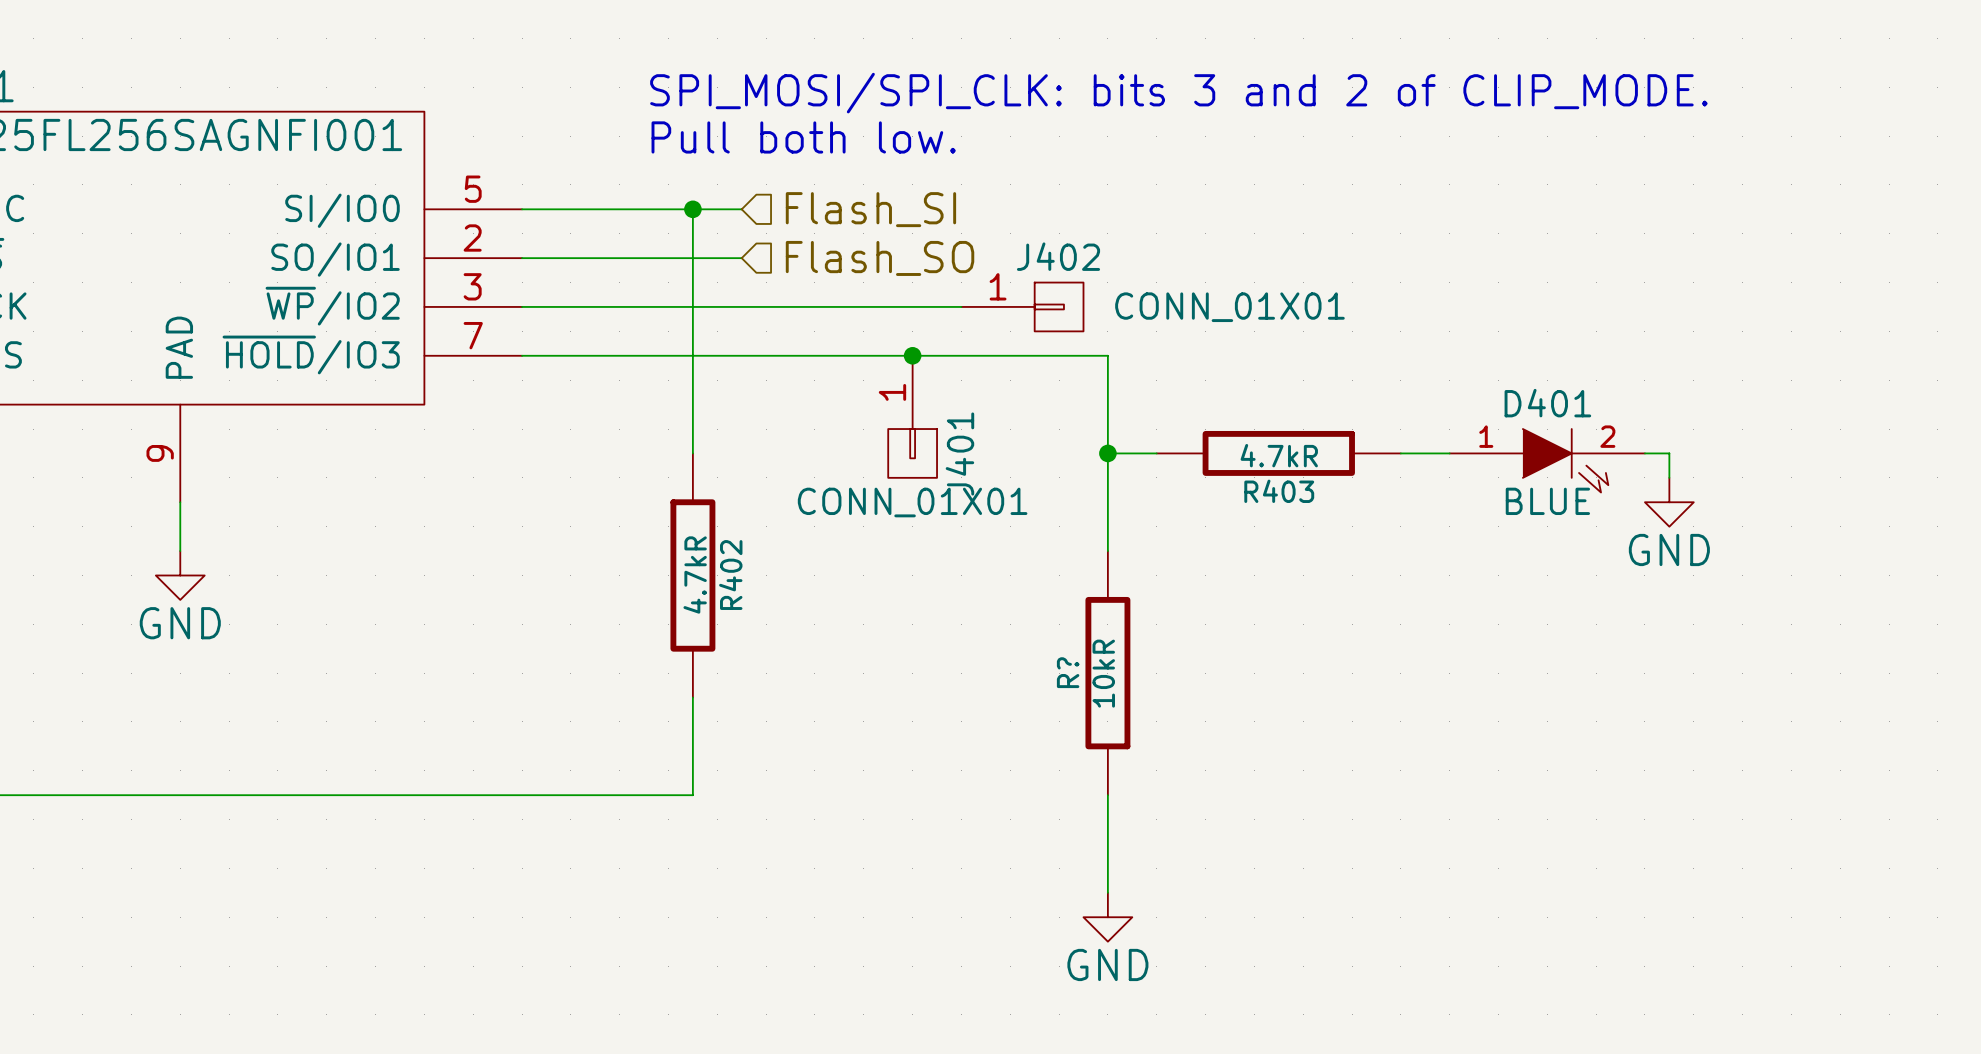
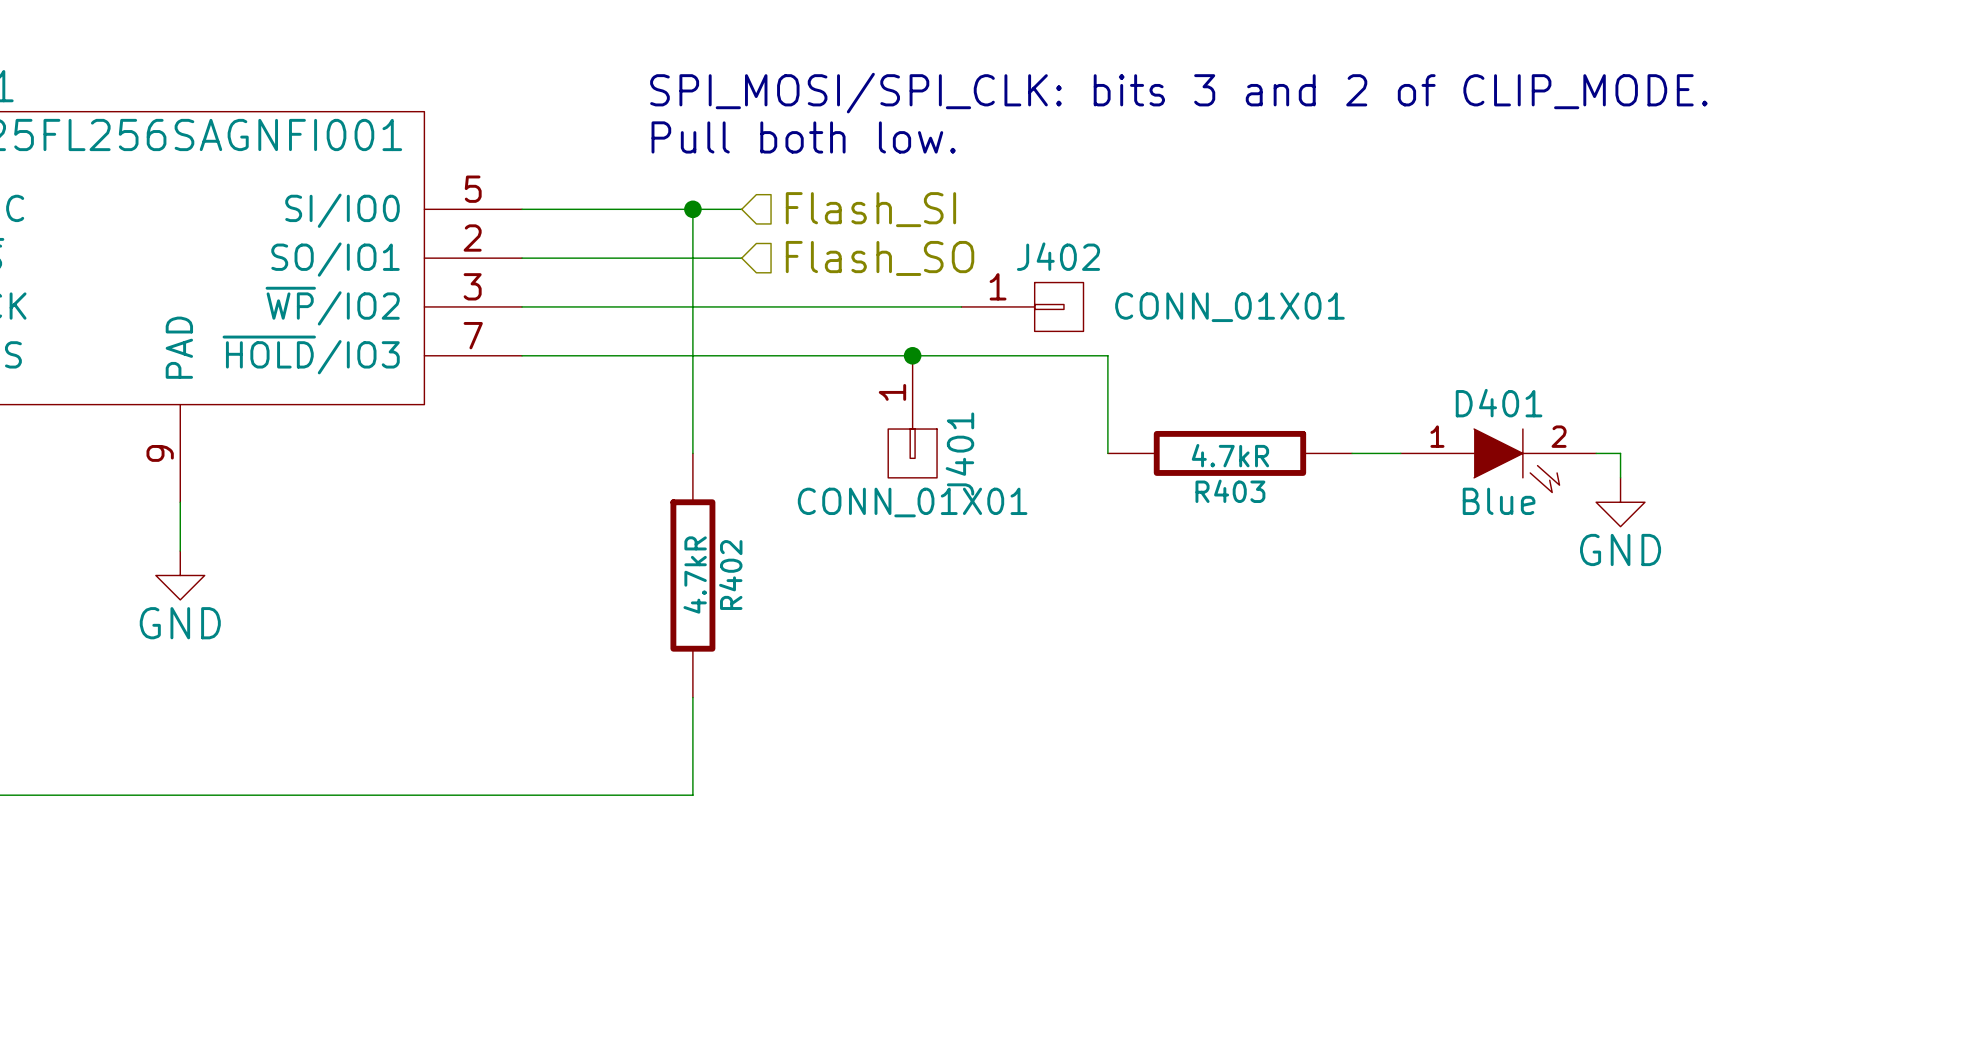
junction: (1107, 453) -> none
wire: (1156, 453) (1107, 453) (1107, 551) -> none
R403 position: (1278, 453) -> (1229, 453)
wire: (1644, 453) (1669, 453) (1669, 477) -> (1596, 453) (1620, 453) (1620, 477)
D401 position: (1547, 460) -> (1498, 460)
D401 value: BLUE (1547, 501) -> Blue (1499, 501)
power symbol position: GND (1669, 502) -> GND (1620, 502)
R?: 10kR (1107, 673) -> none
wire: (1107, 795) (1107, 892) -> none
power symbol: GND (1107, 917) -> none

